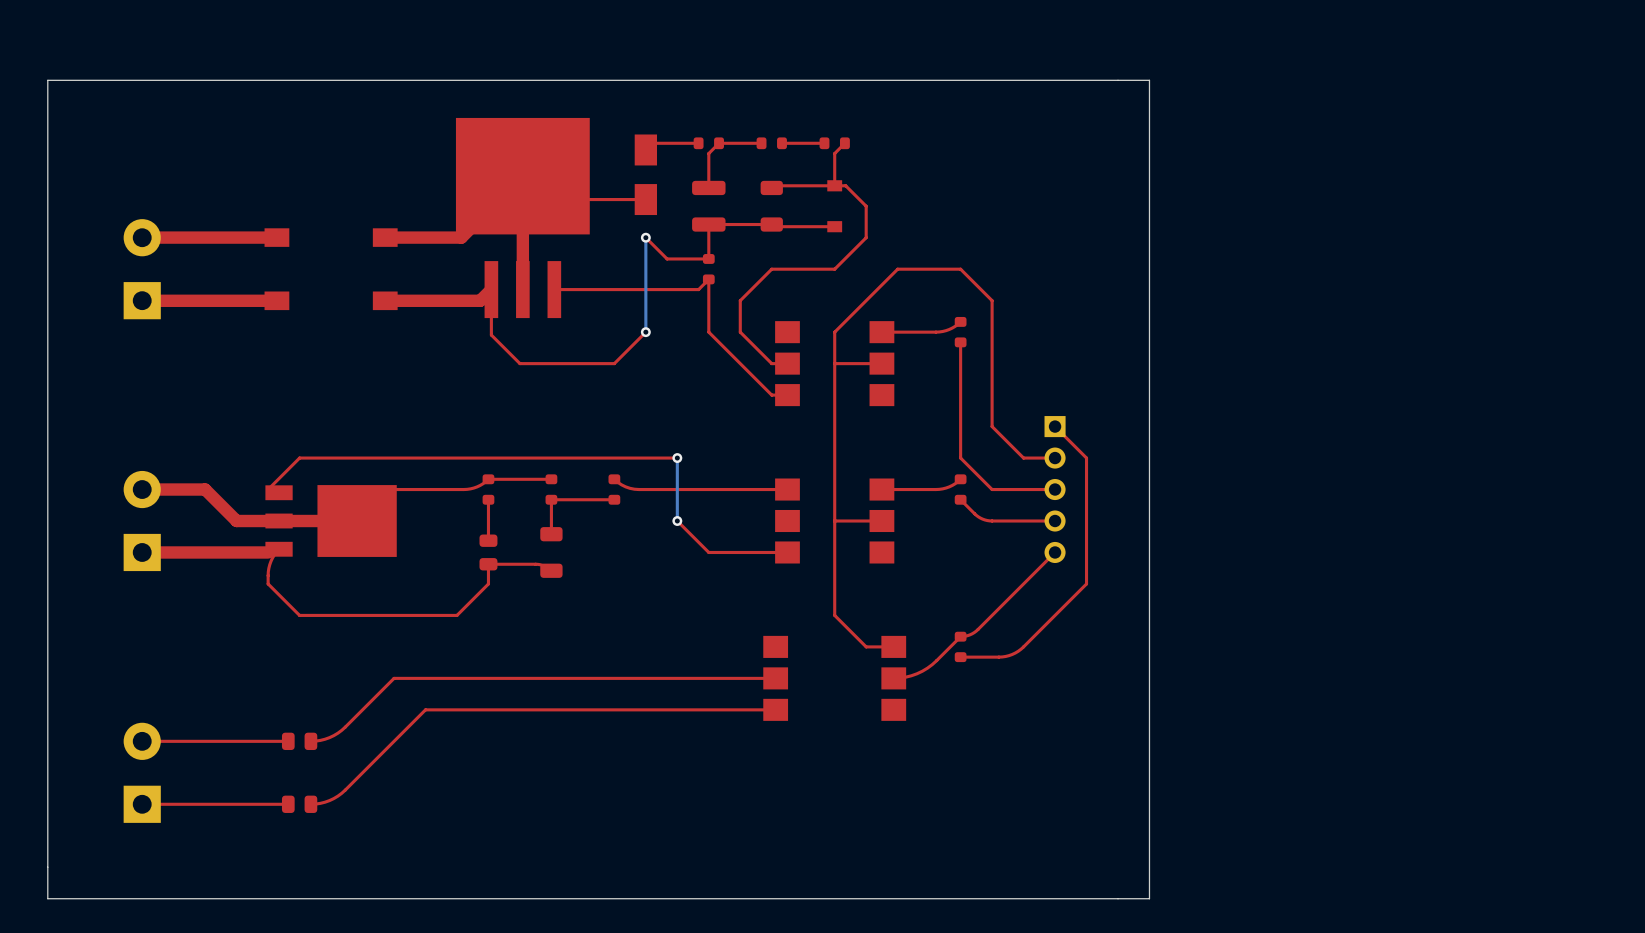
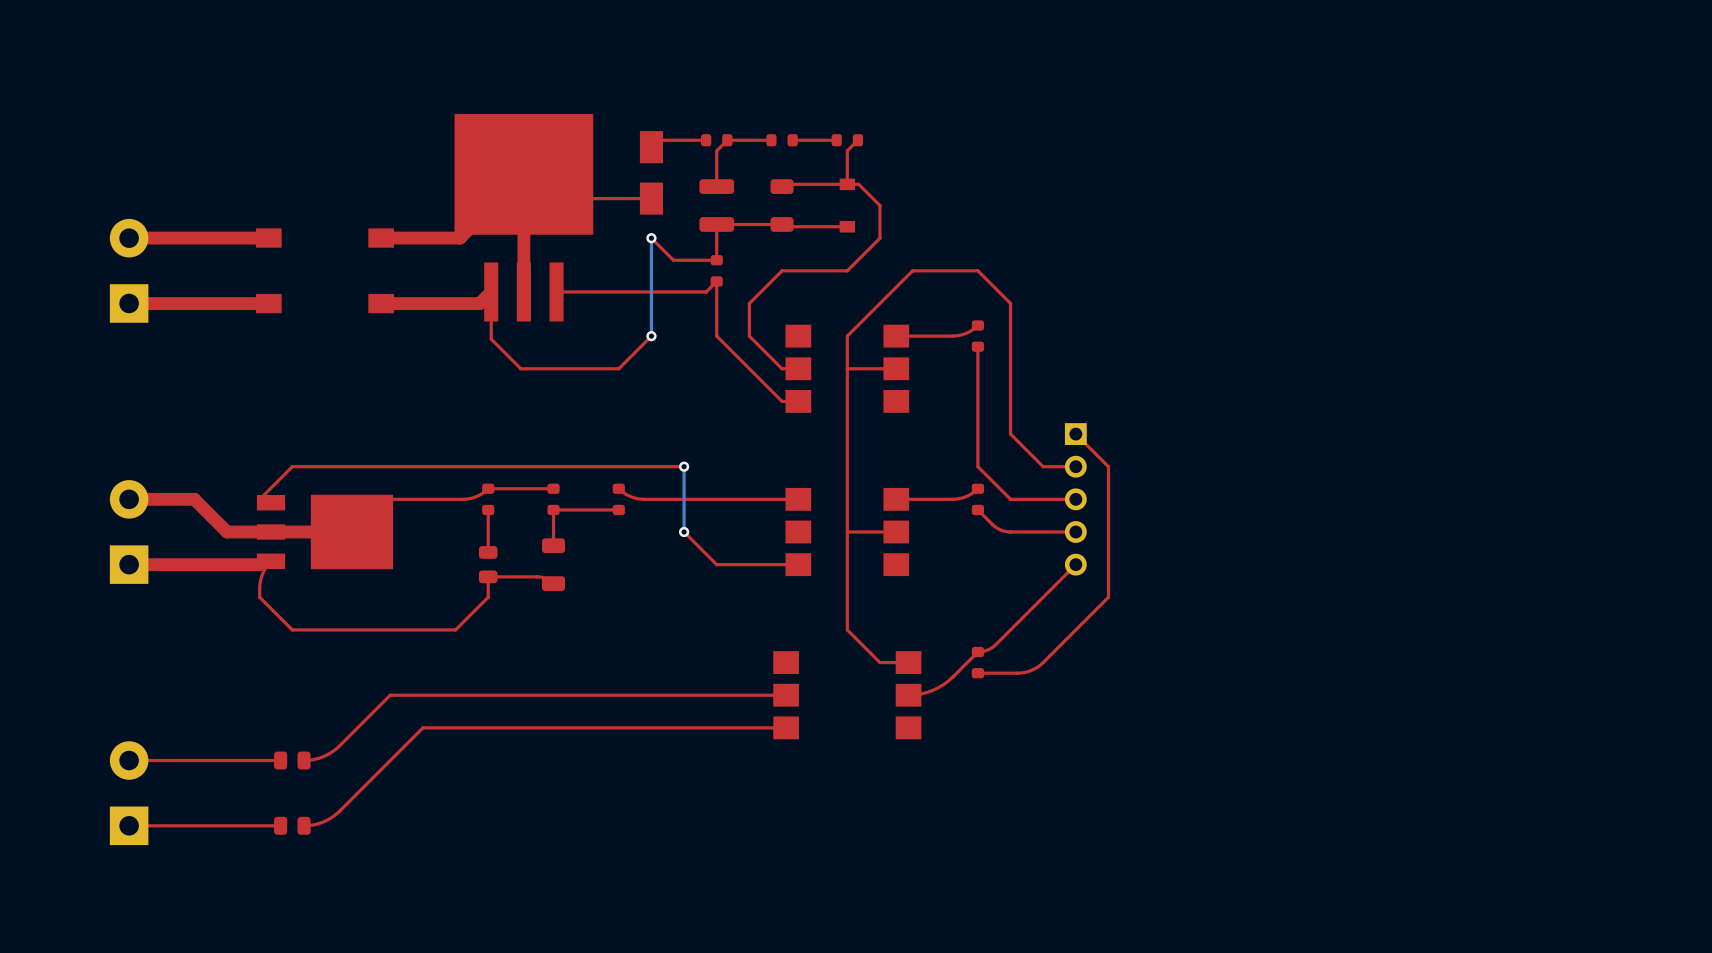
board edge: (1149, 80) (47, 80) (47, 898) (1149, 898) (1149, 80) -> none

